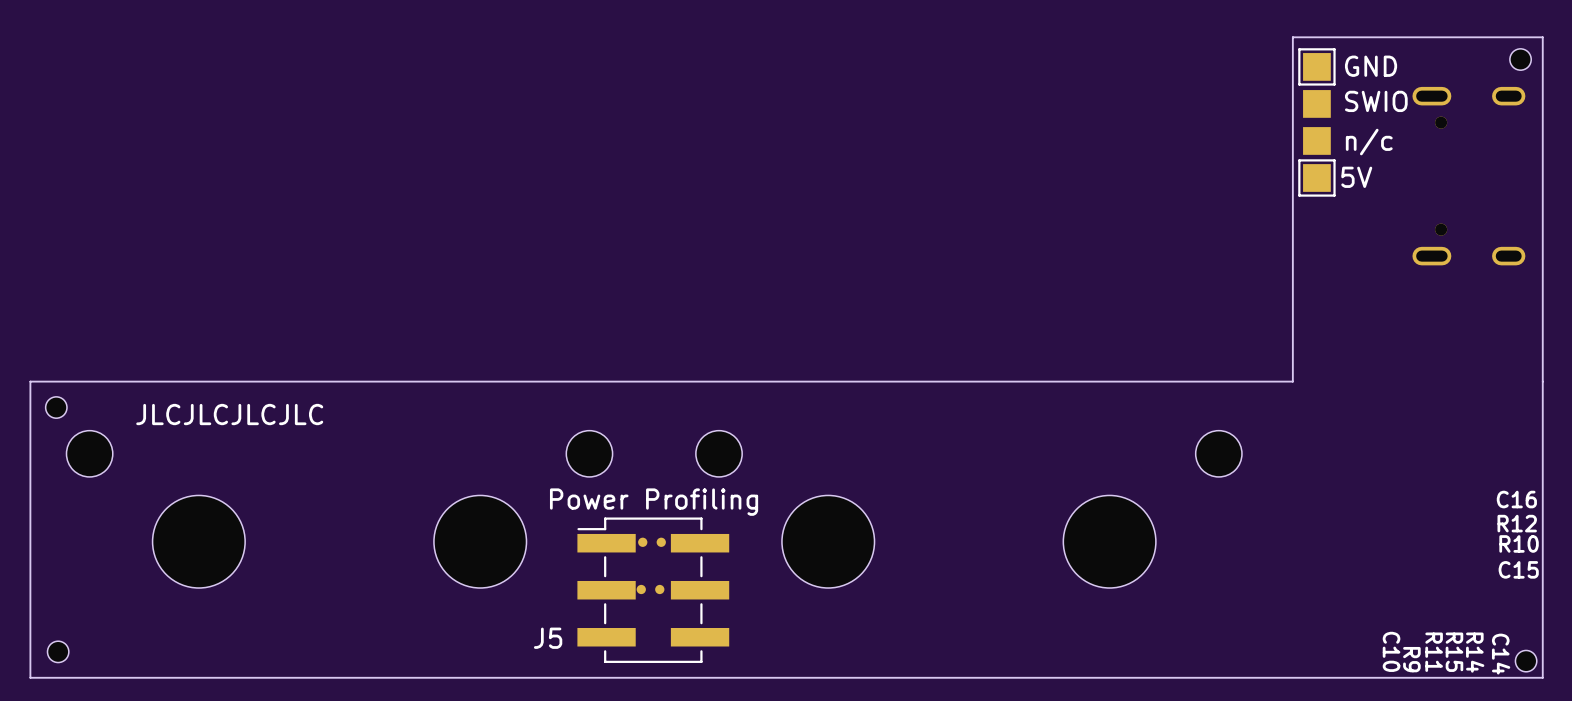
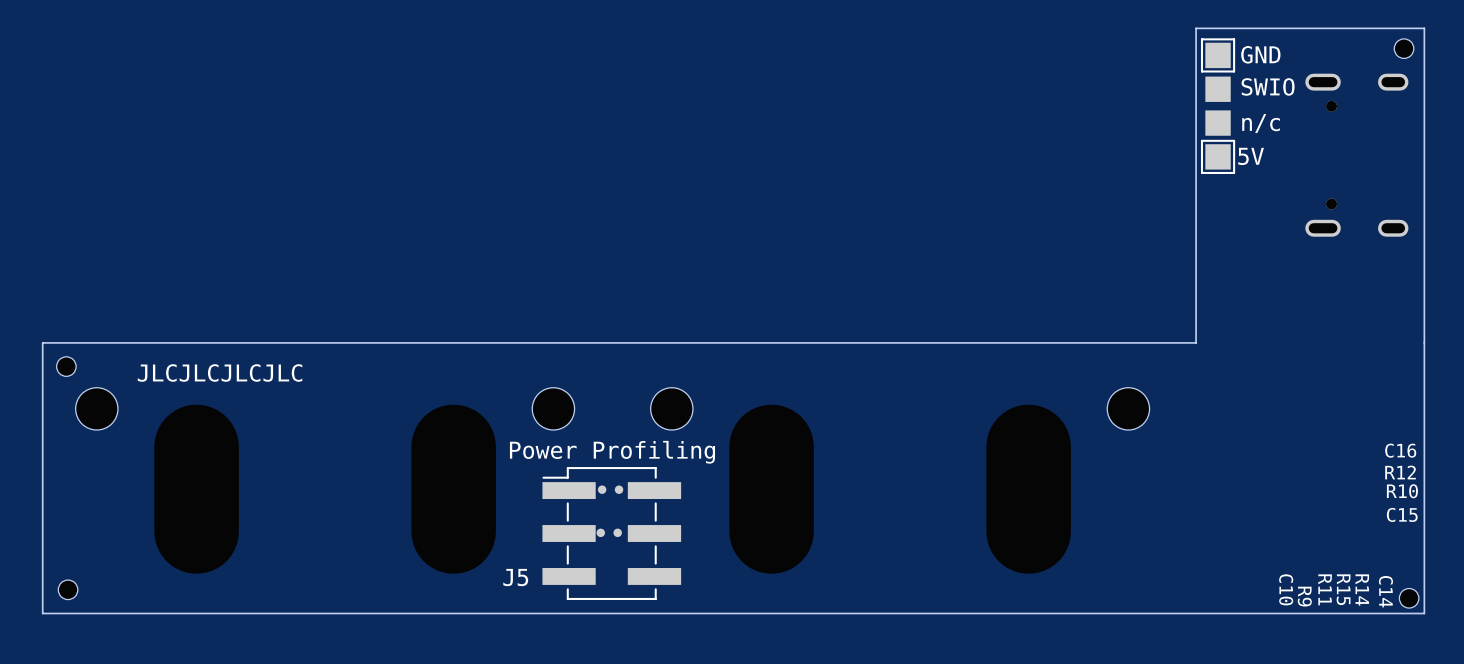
part footprint: [152, 495, 246, 589] -> [154, 404, 239, 574]
part footprint: [433, 495, 527, 589] -> [411, 404, 496, 574]
part footprint: [781, 495, 875, 589] -> [729, 404, 814, 574]
part footprint: [1063, 495, 1156, 589] -> [986, 404, 1071, 574]

